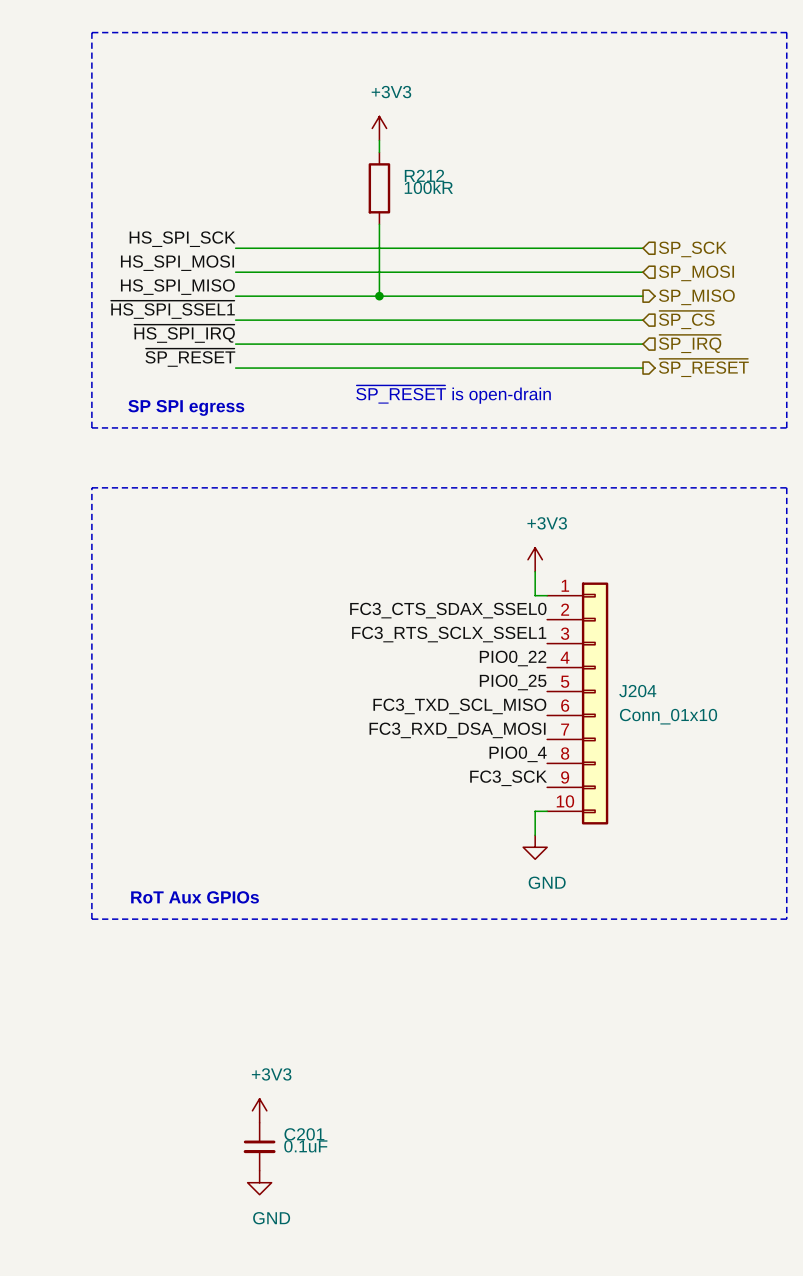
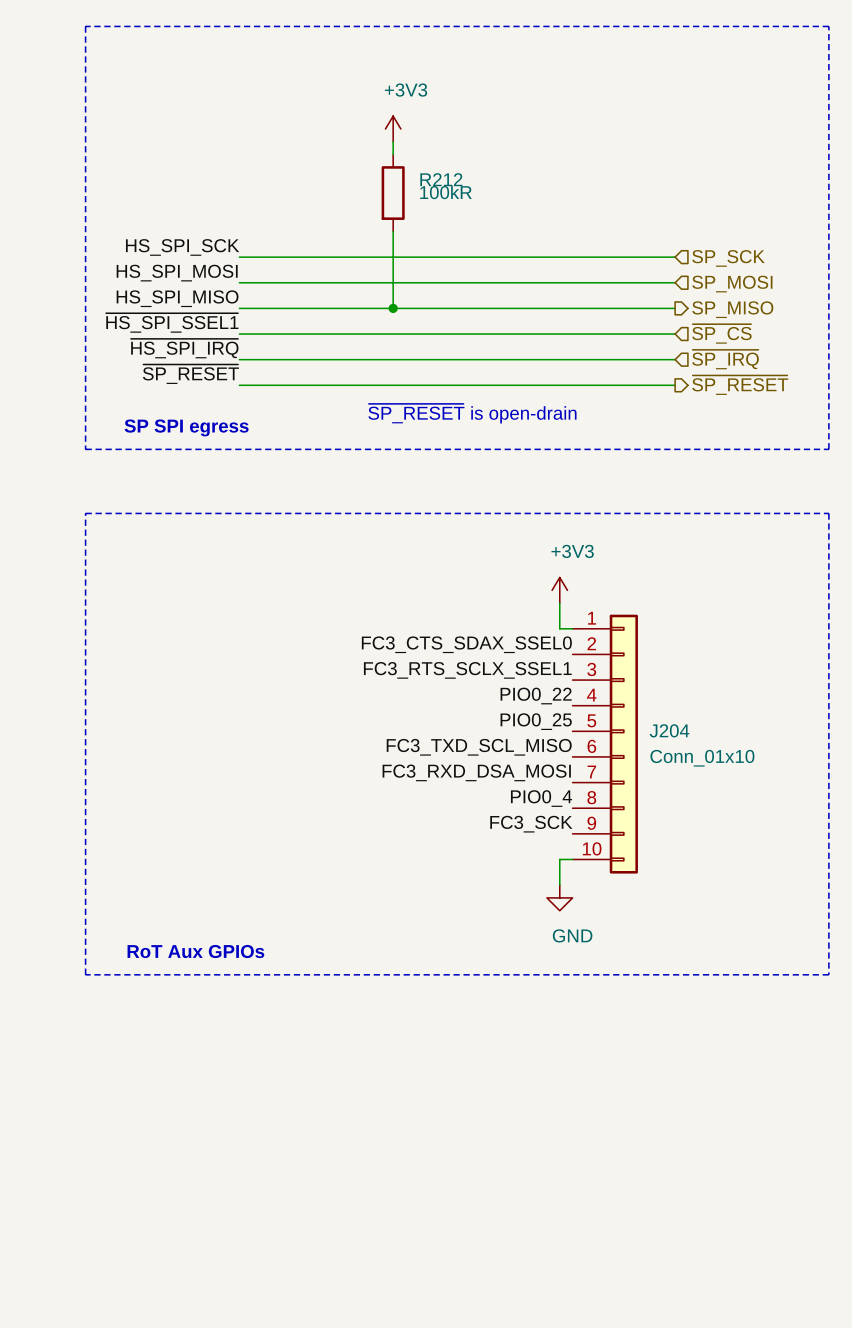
power symbol: +3V3 (259, 1110) -> none
C201: 0.1uF (259, 1146) -> none
power symbol: GND (259, 1182) -> none

